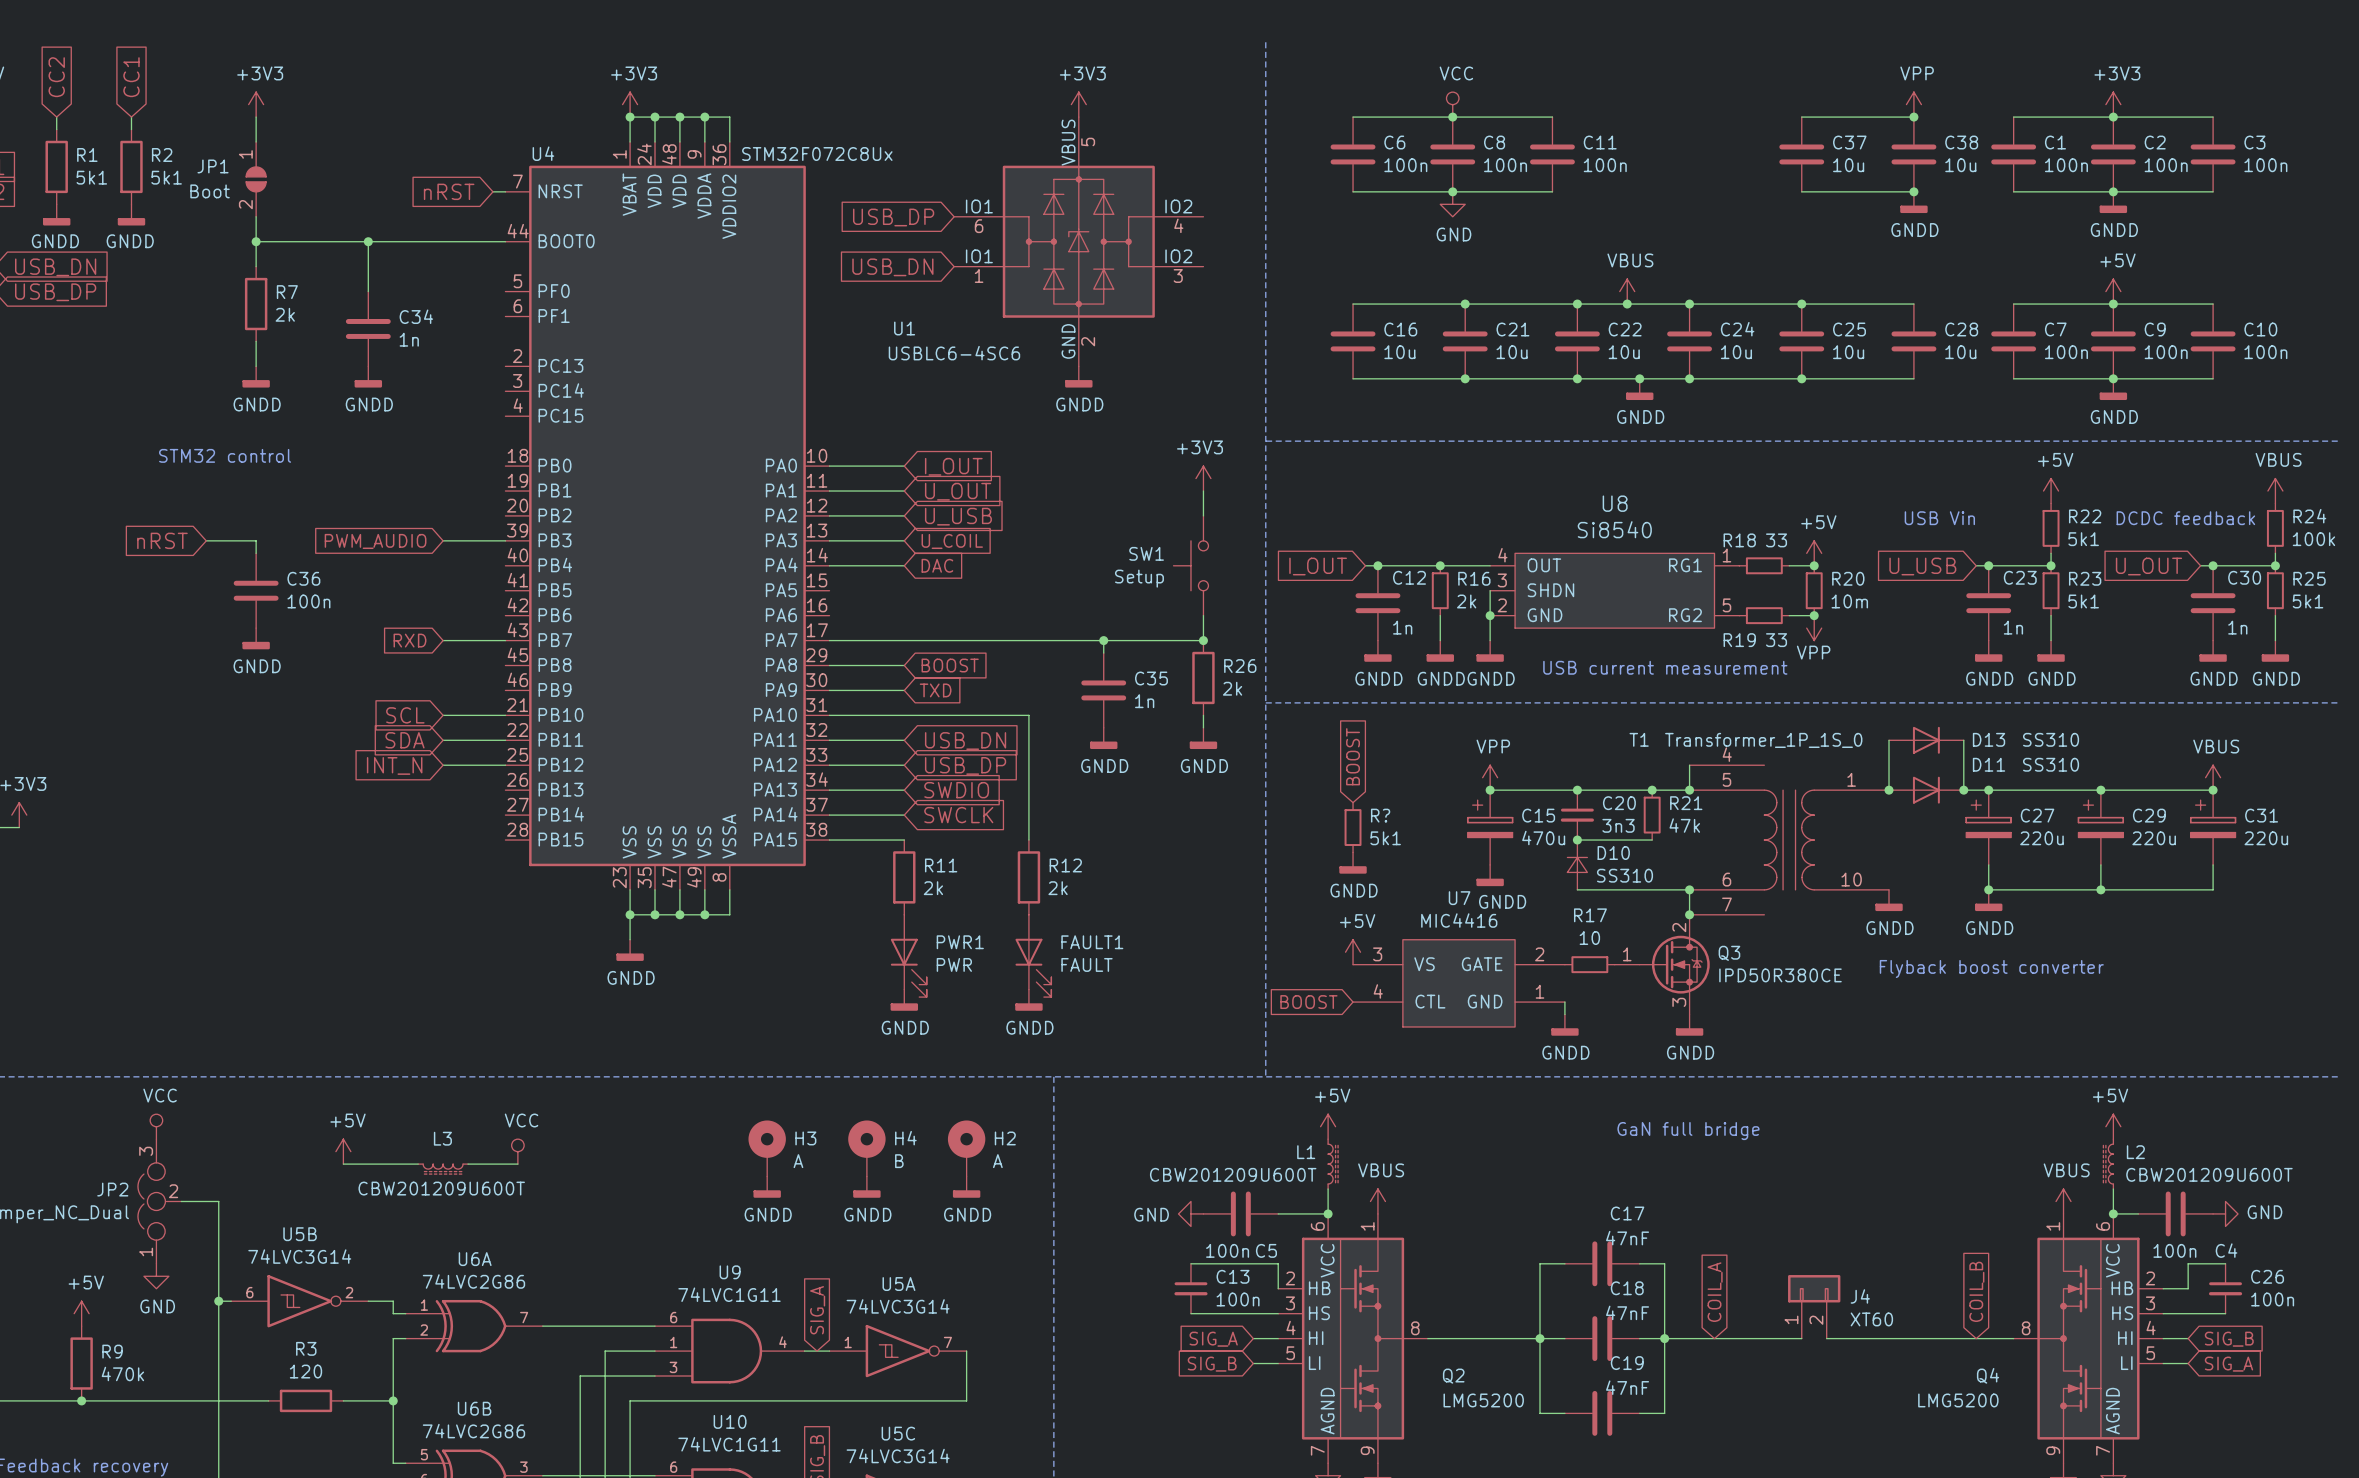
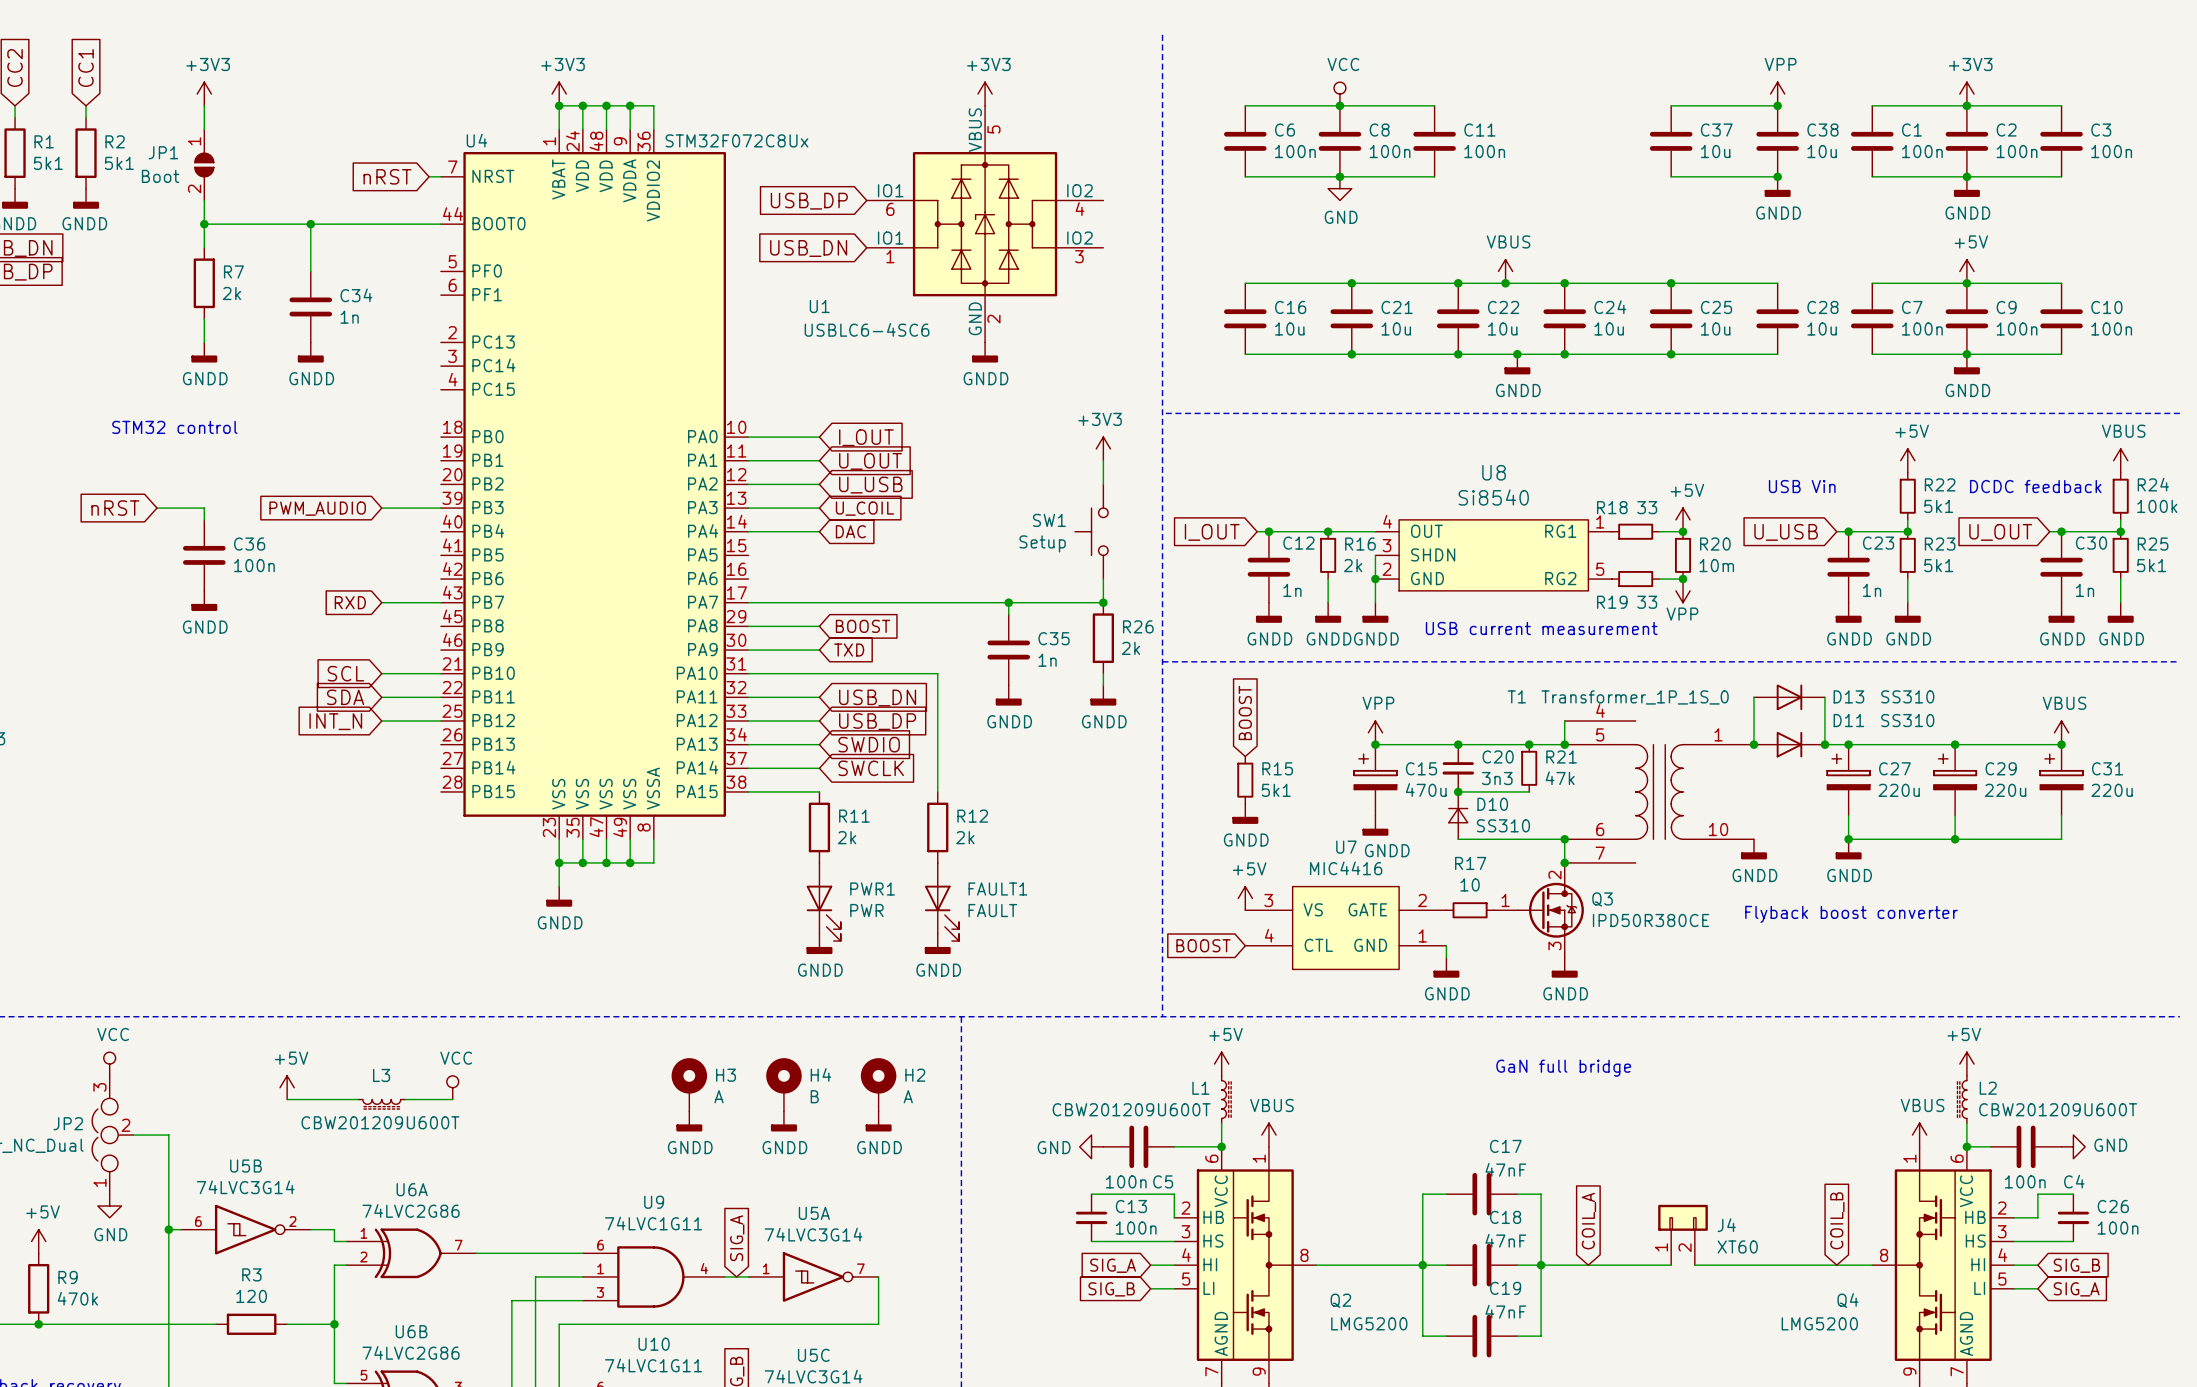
R? name: R? (1380, 815) -> R15 (1277, 768)

